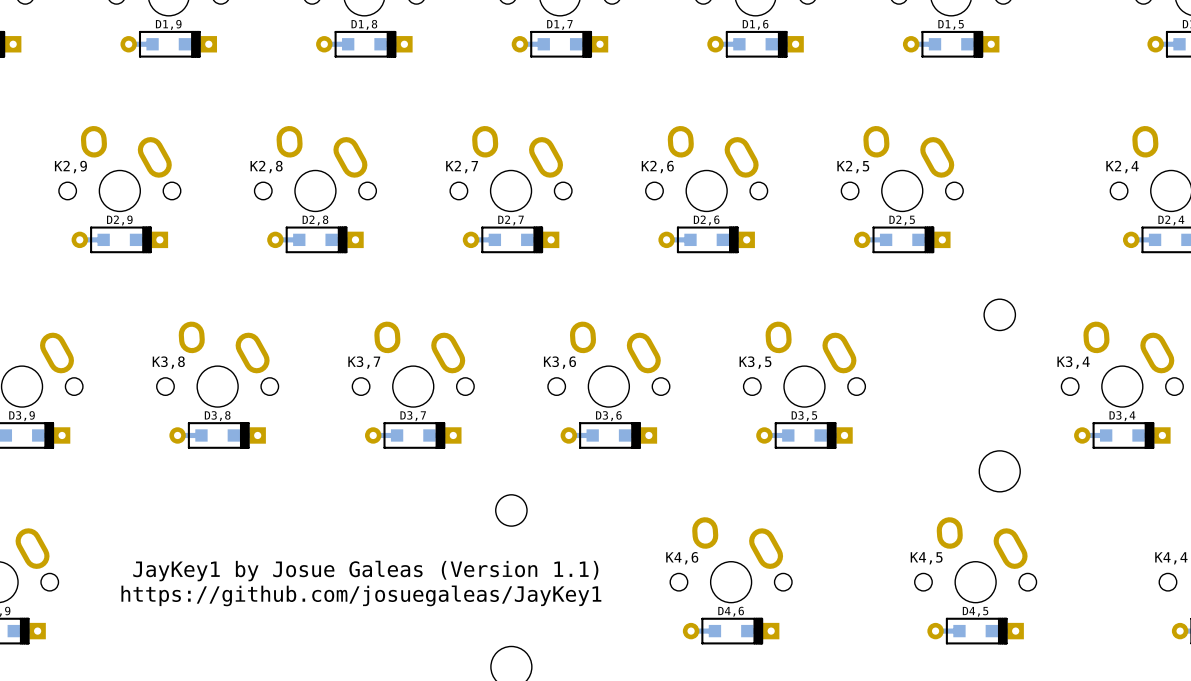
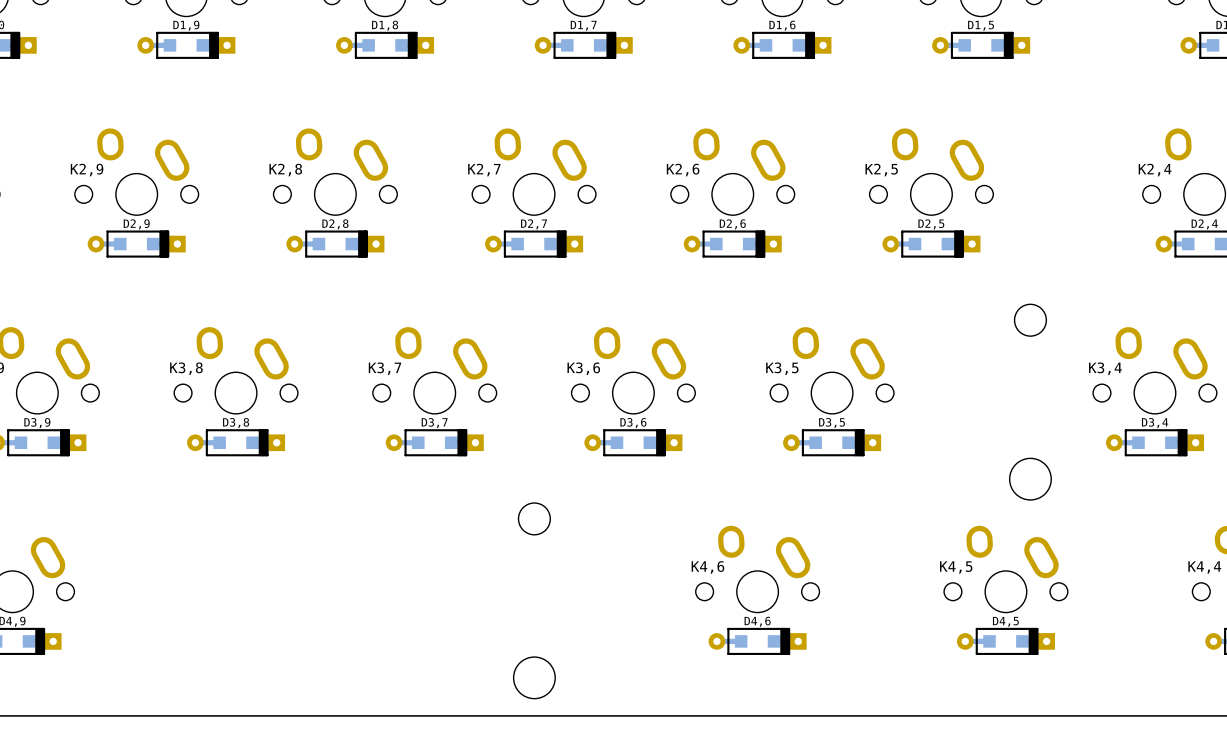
text: JayKey1 by Josue Galeas (Version 1.1) (365, 571) -> none
text: https://github.com/josuegaleas/JayKey1 (361, 595) -> none

